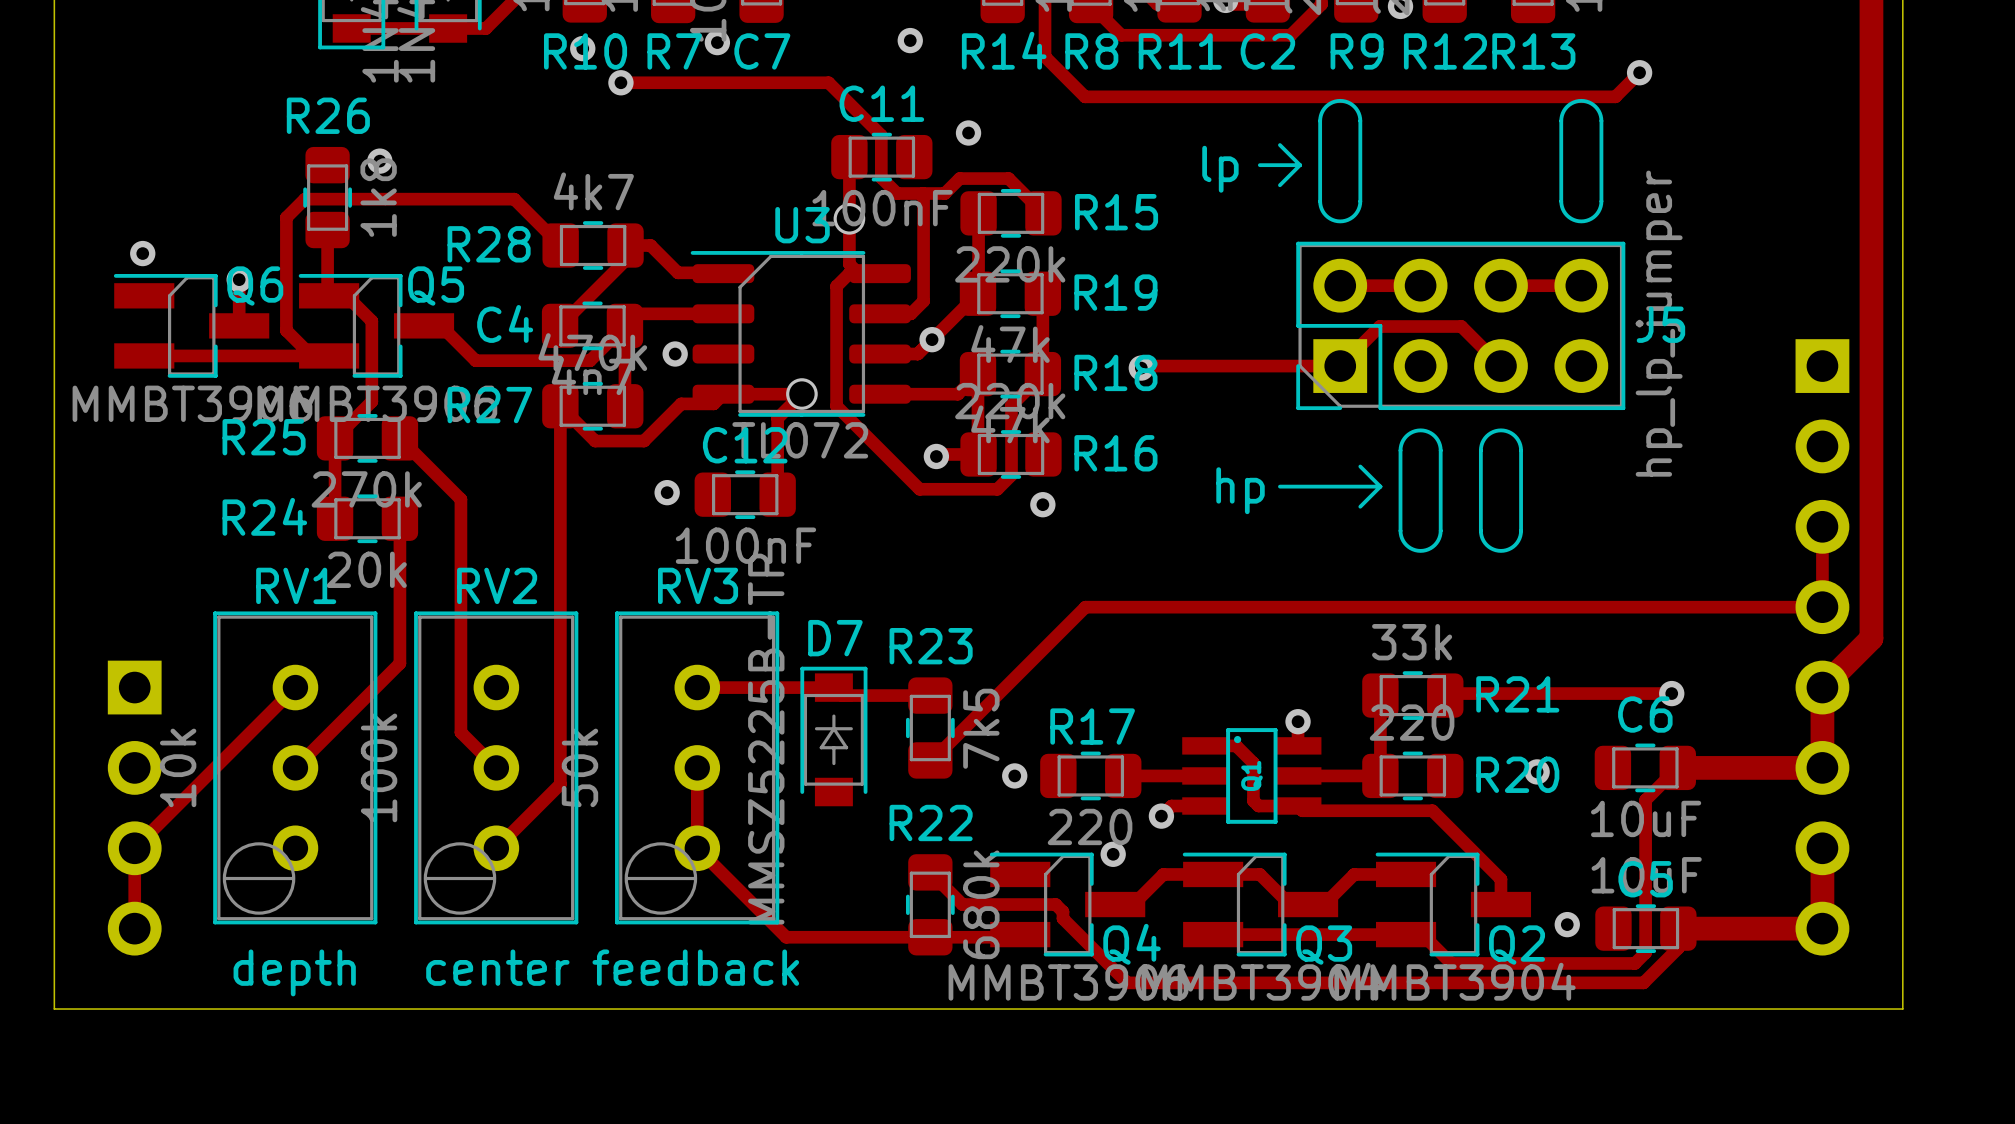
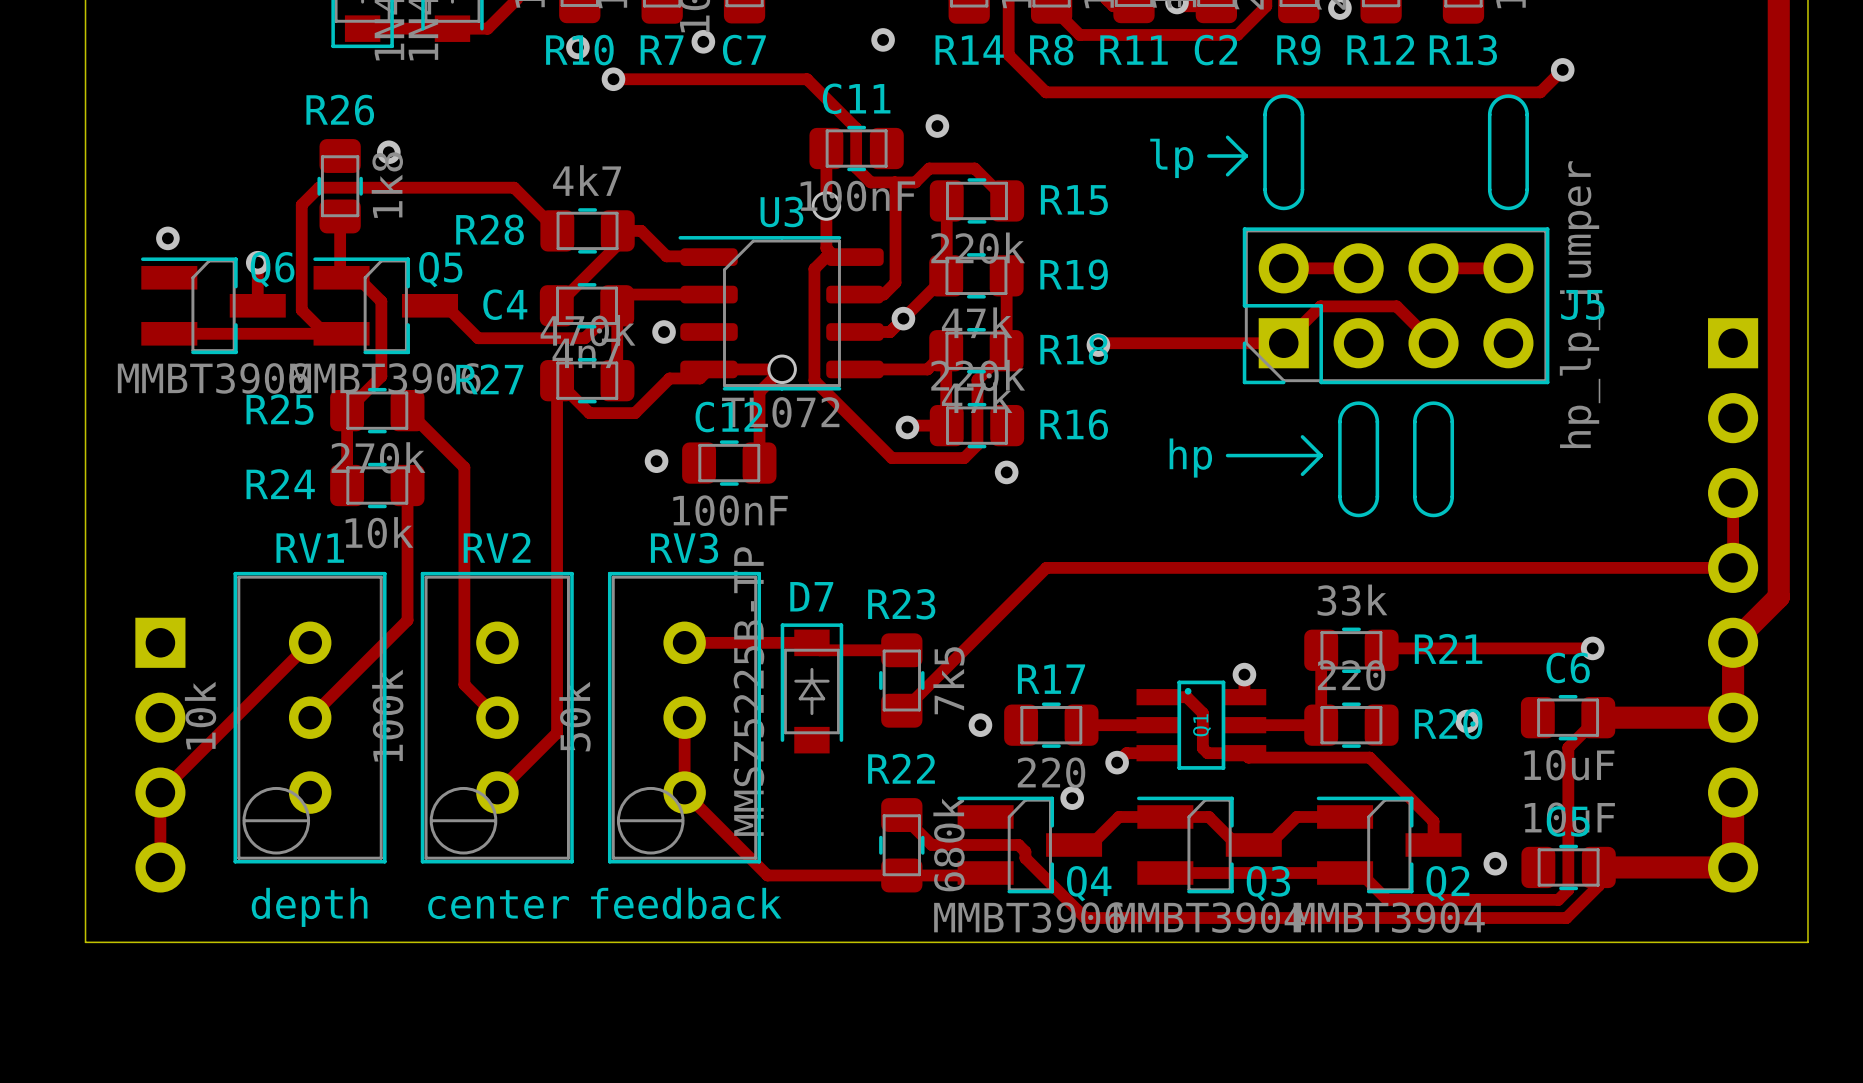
R24 value: 20k (366, 569) -> 10k (379, 532)

